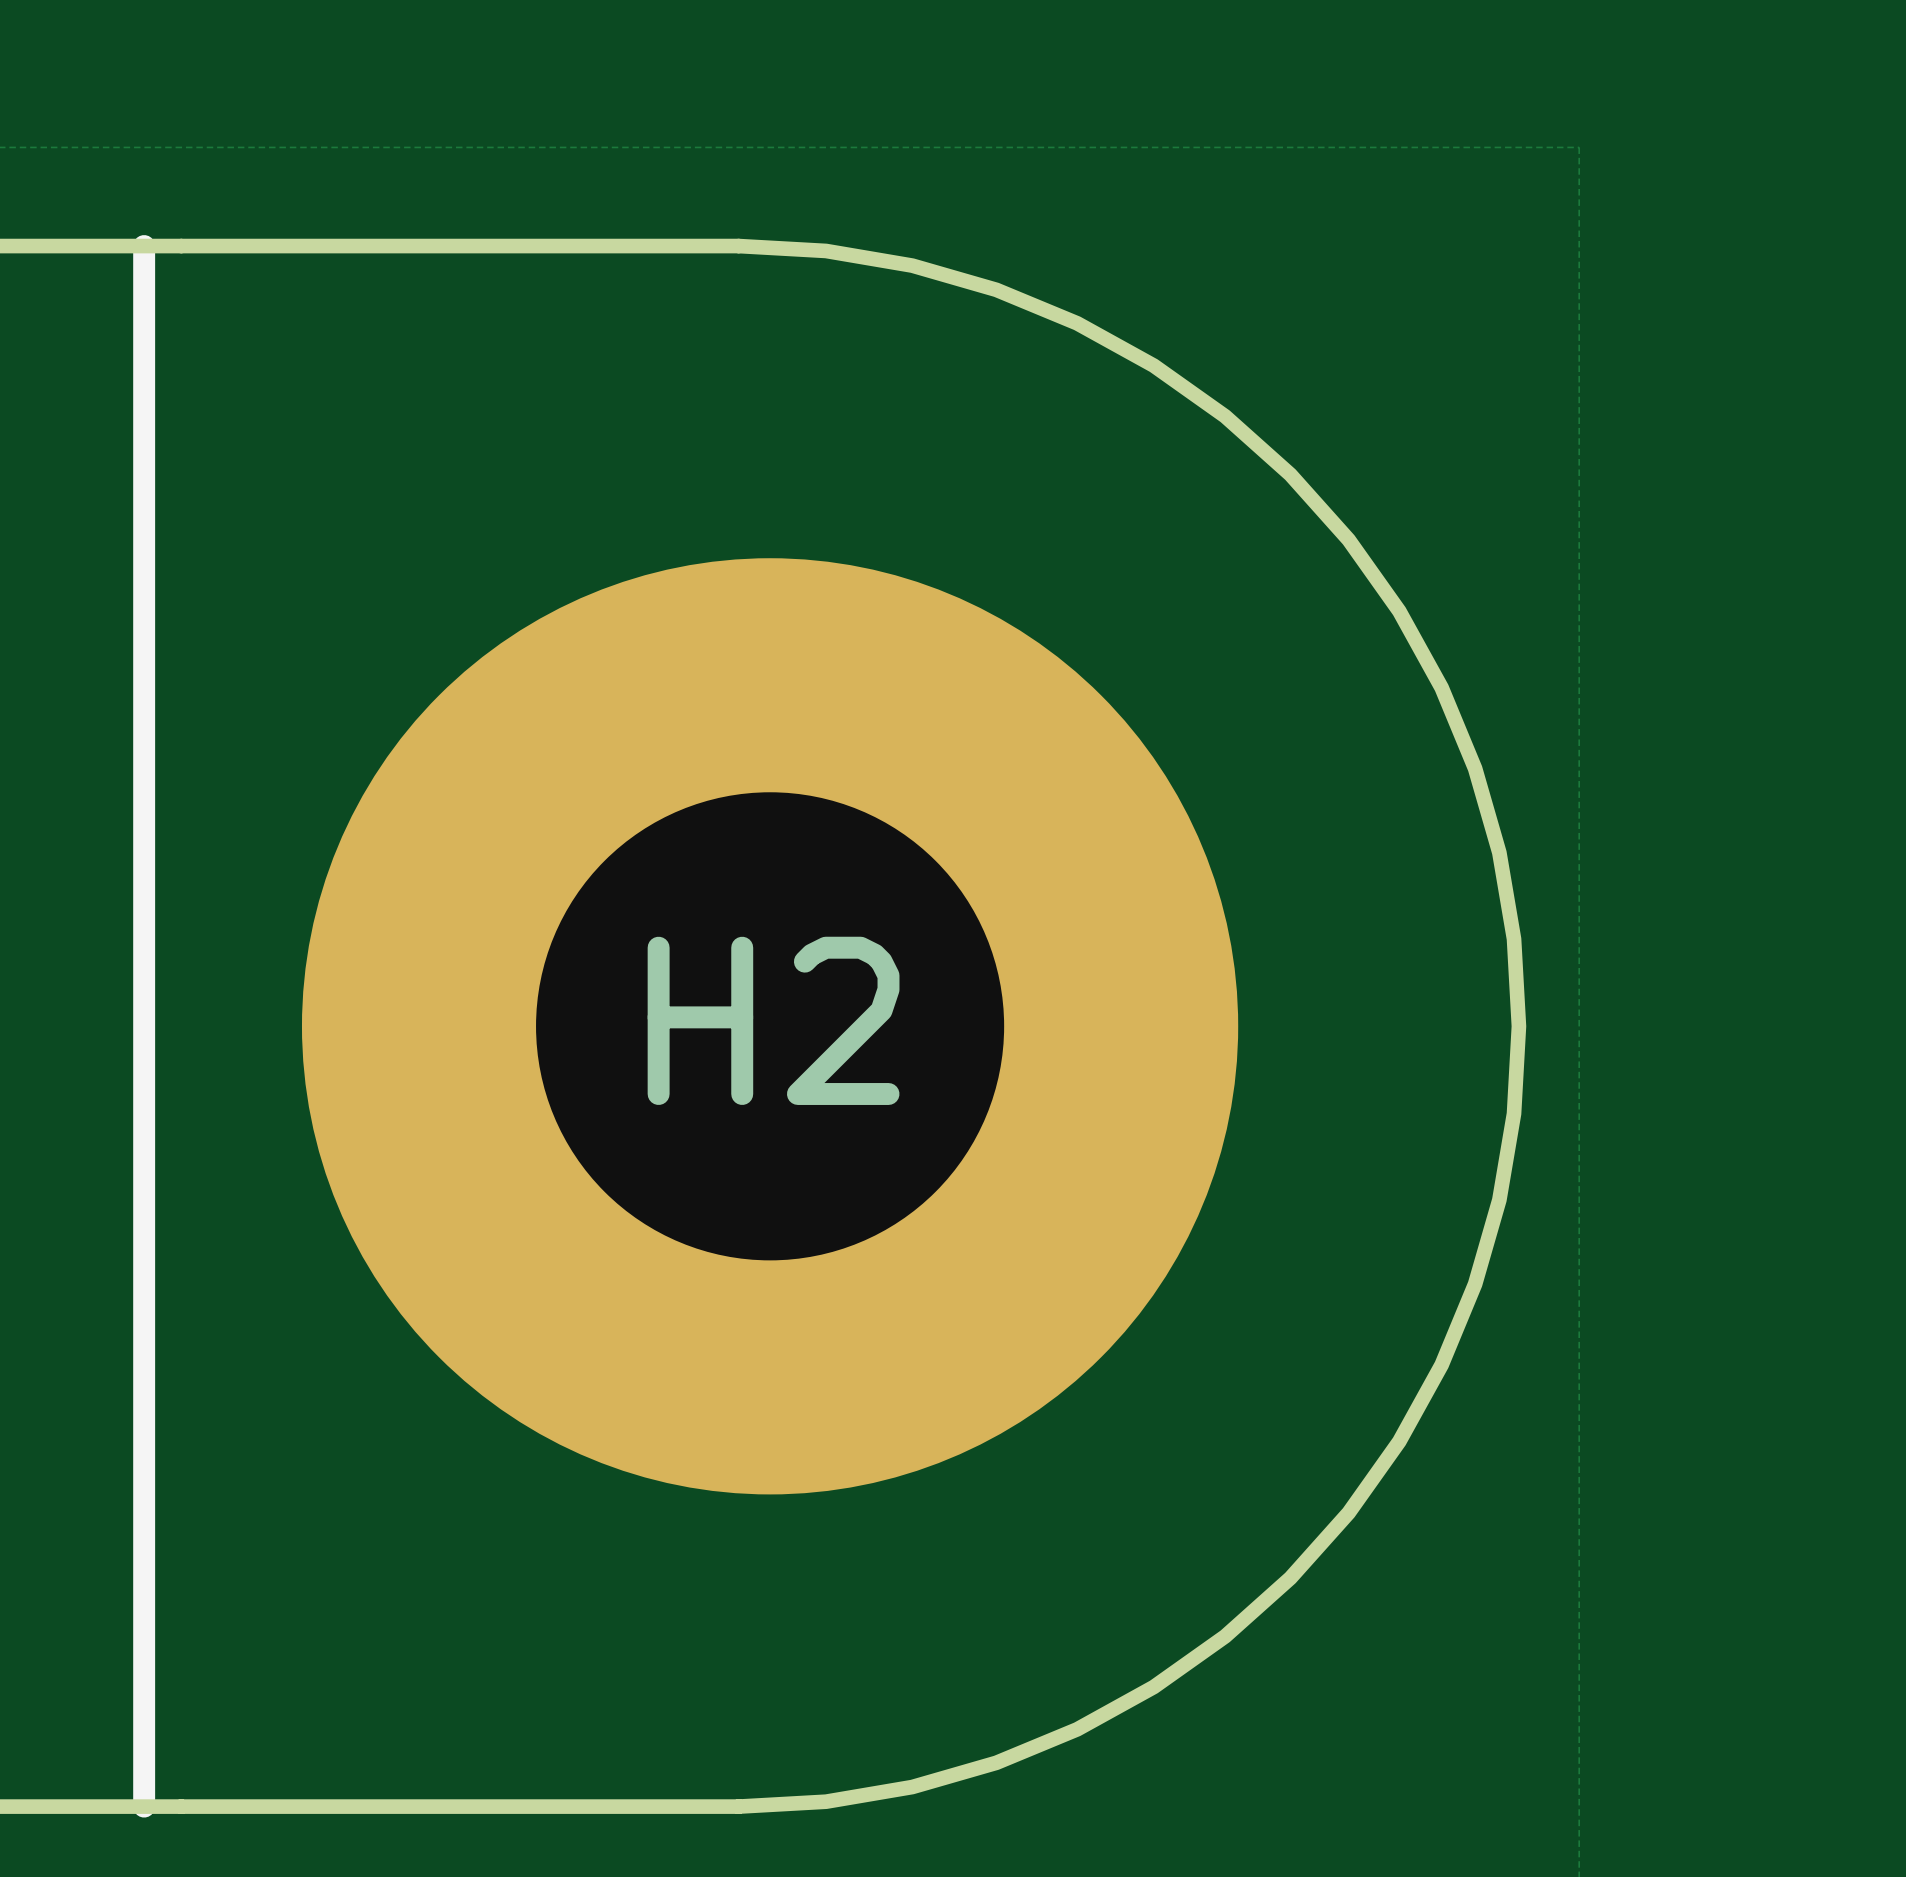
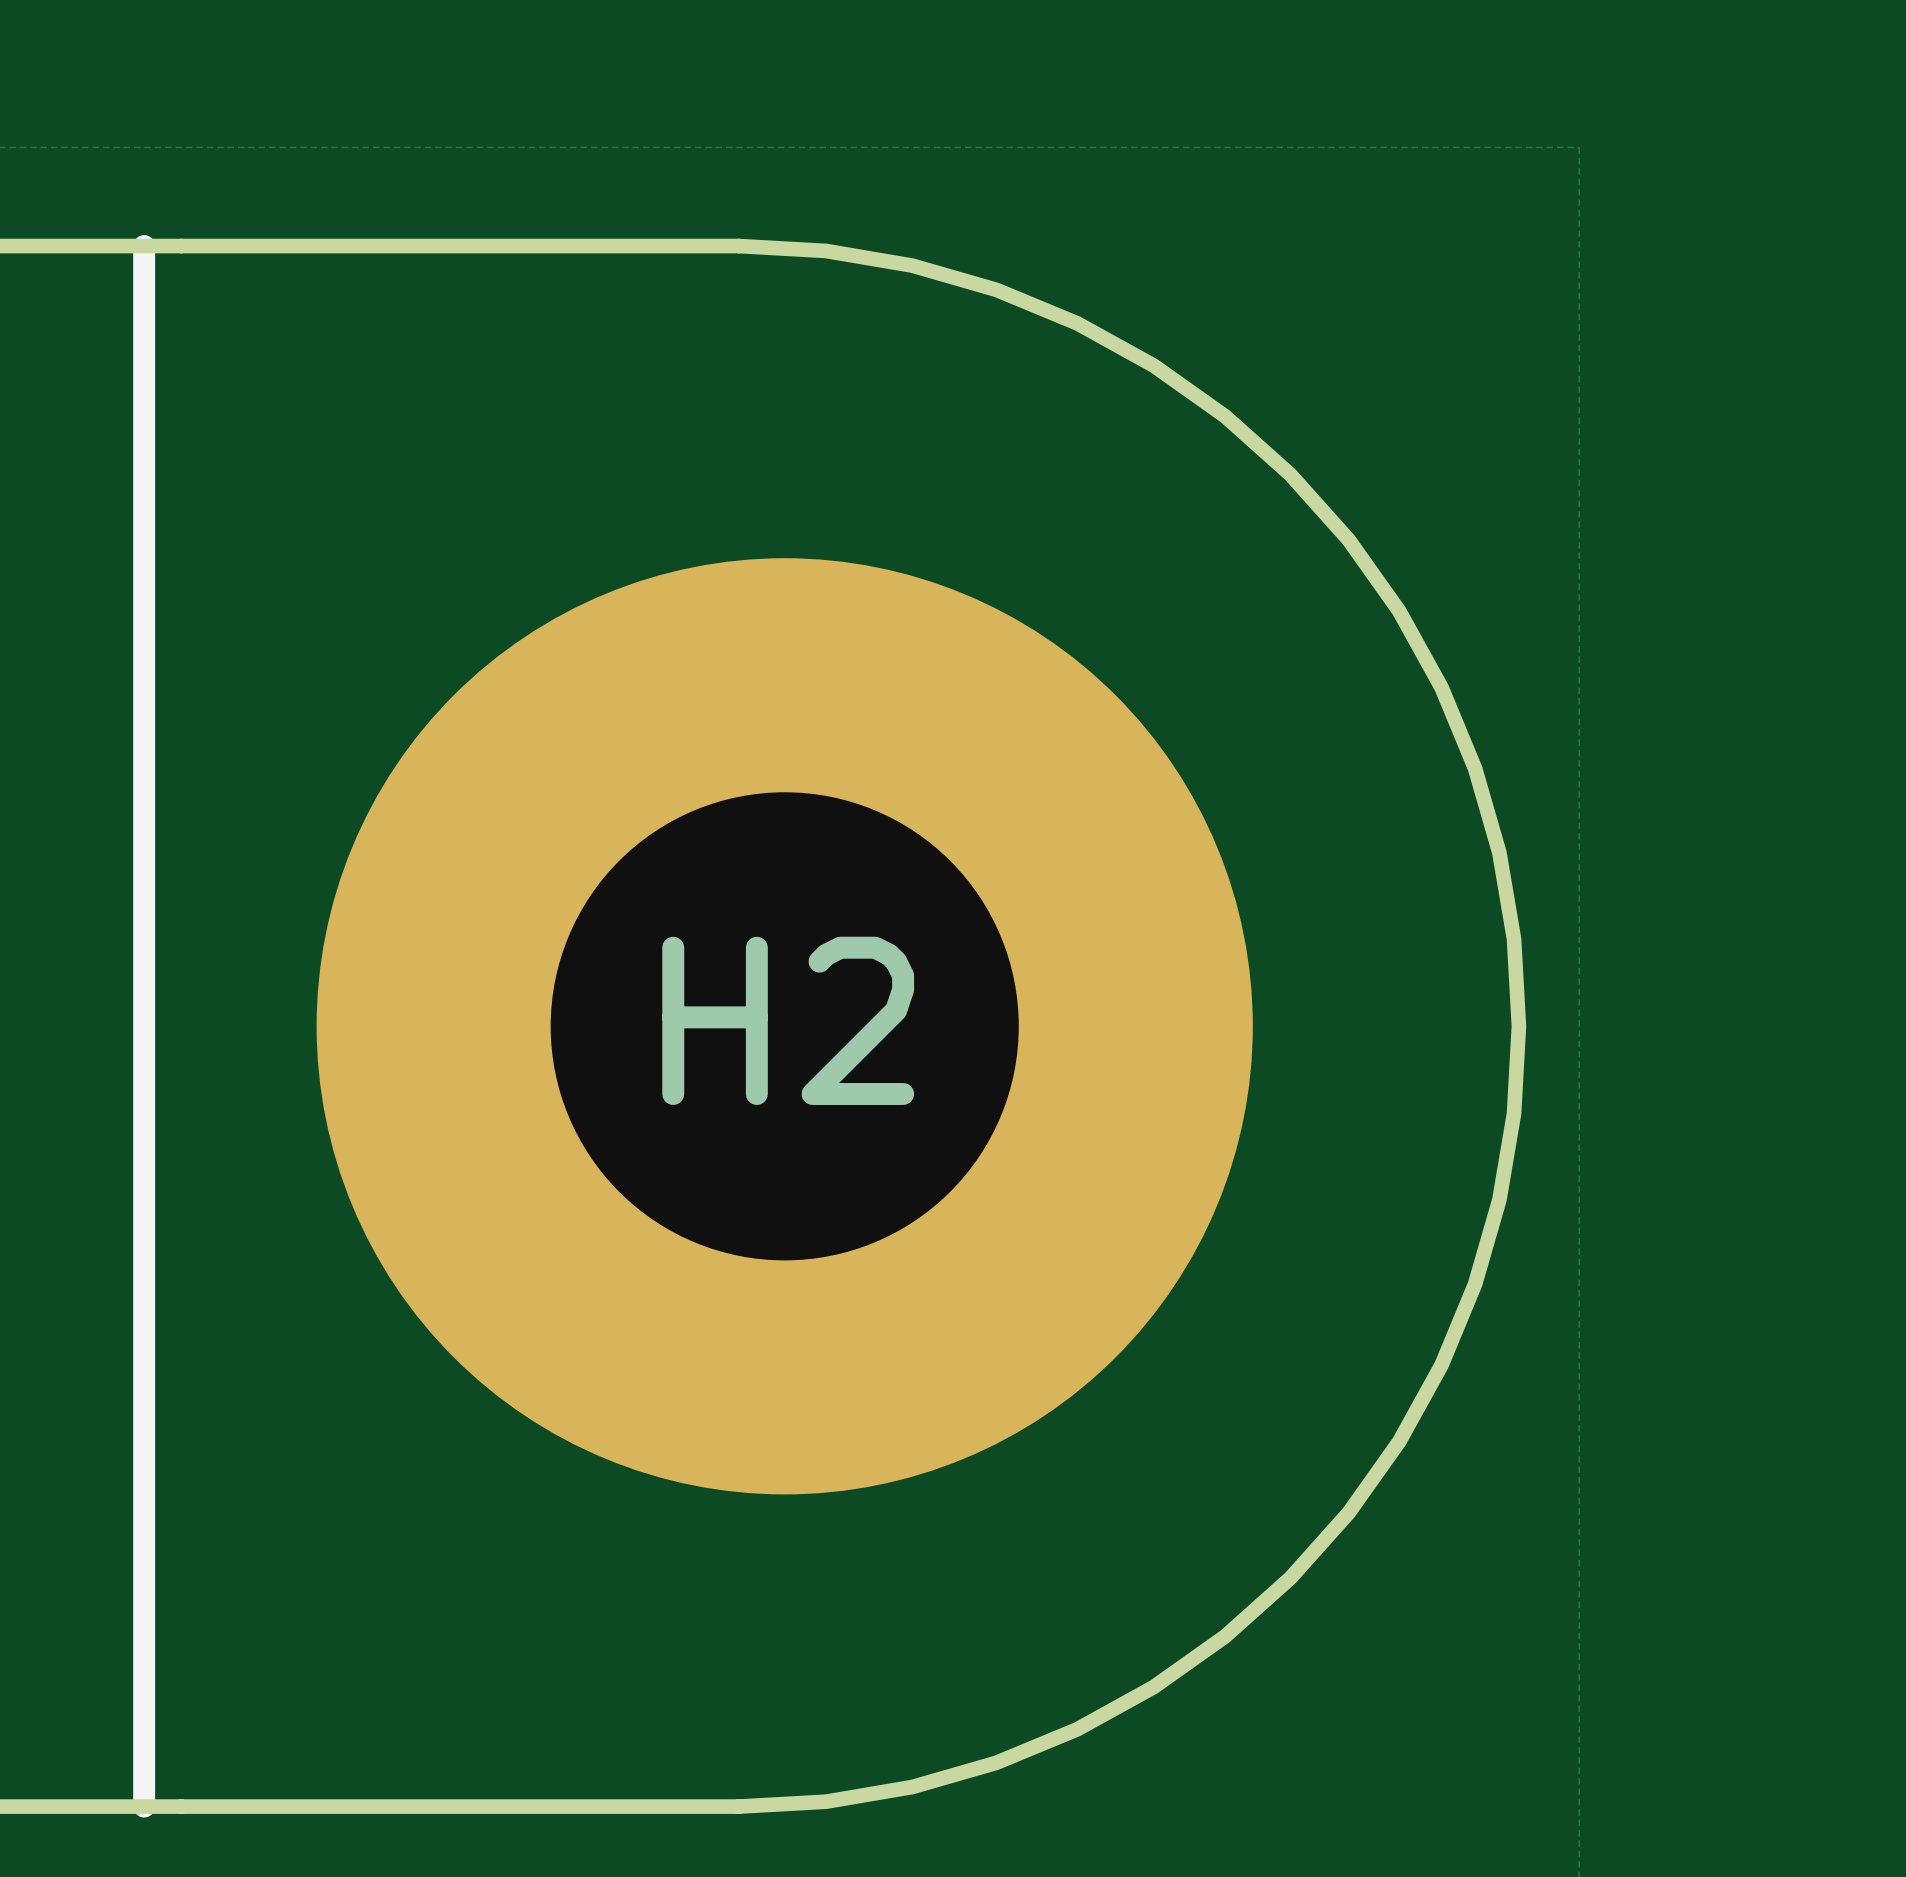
H2 position: (770, 1026) -> (784, 1026)

